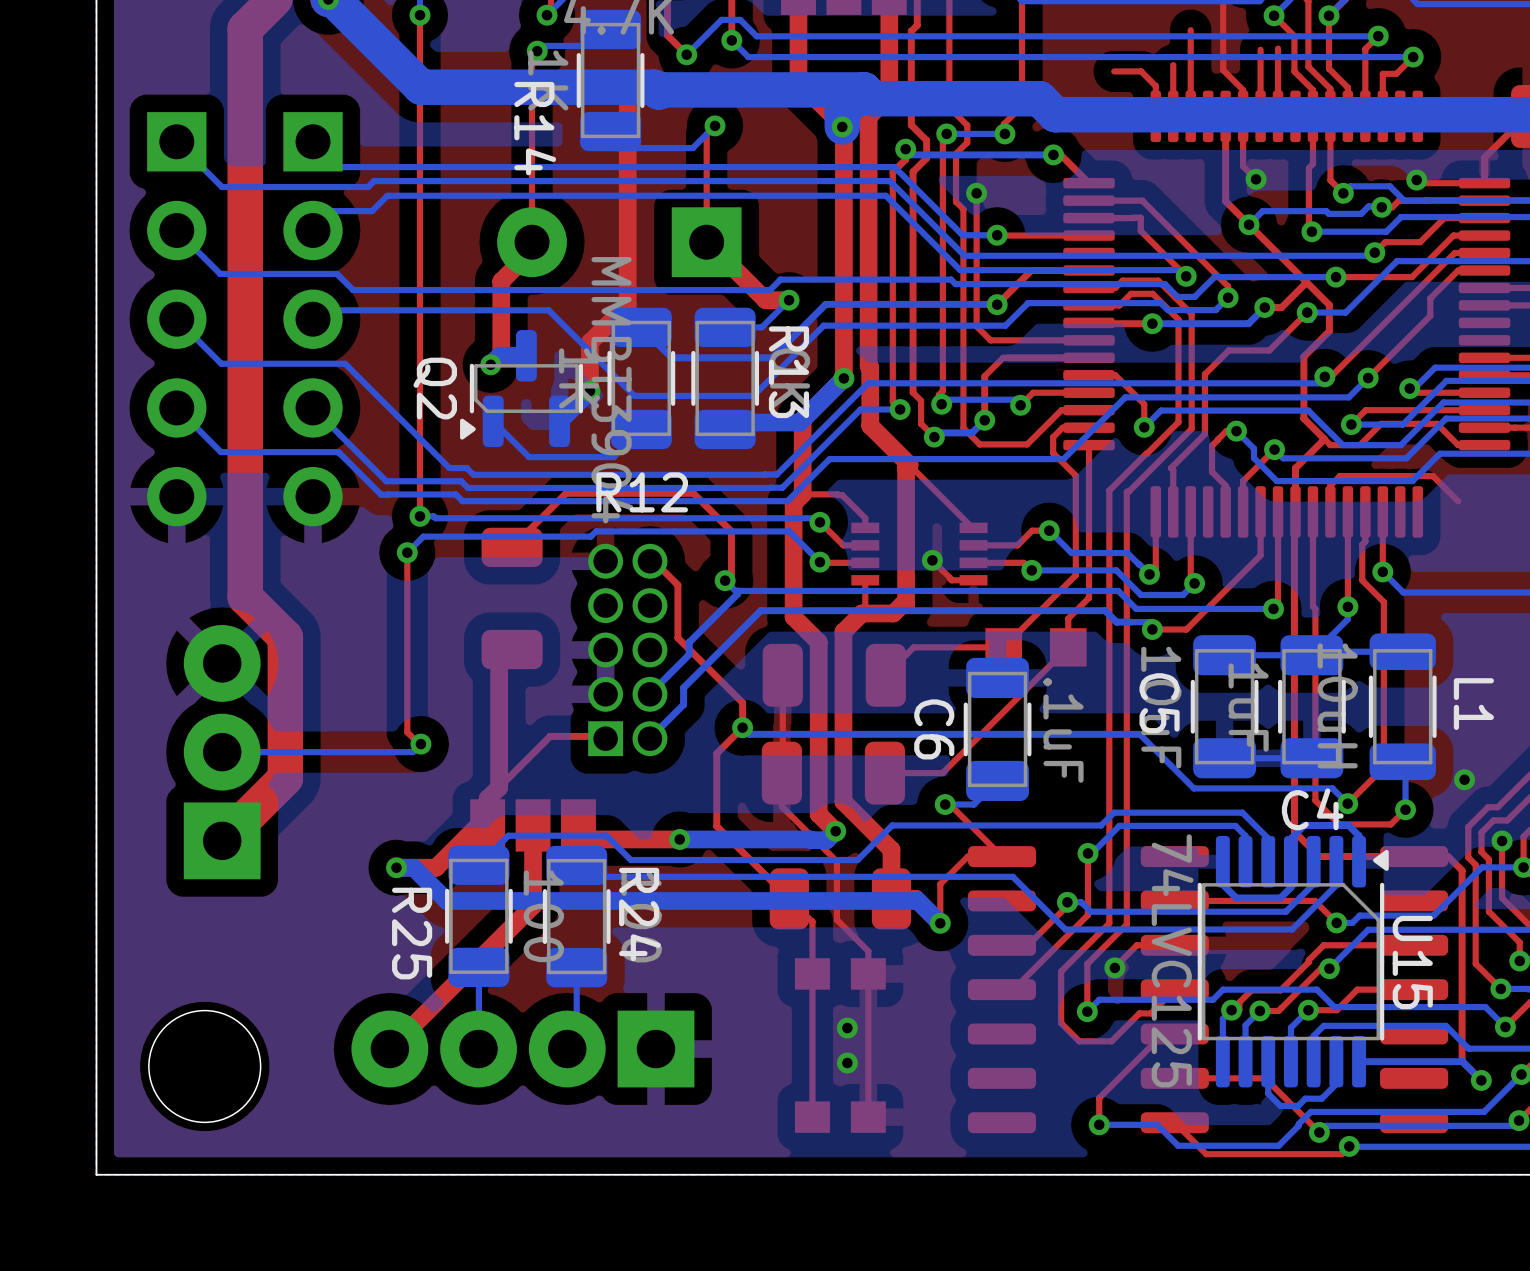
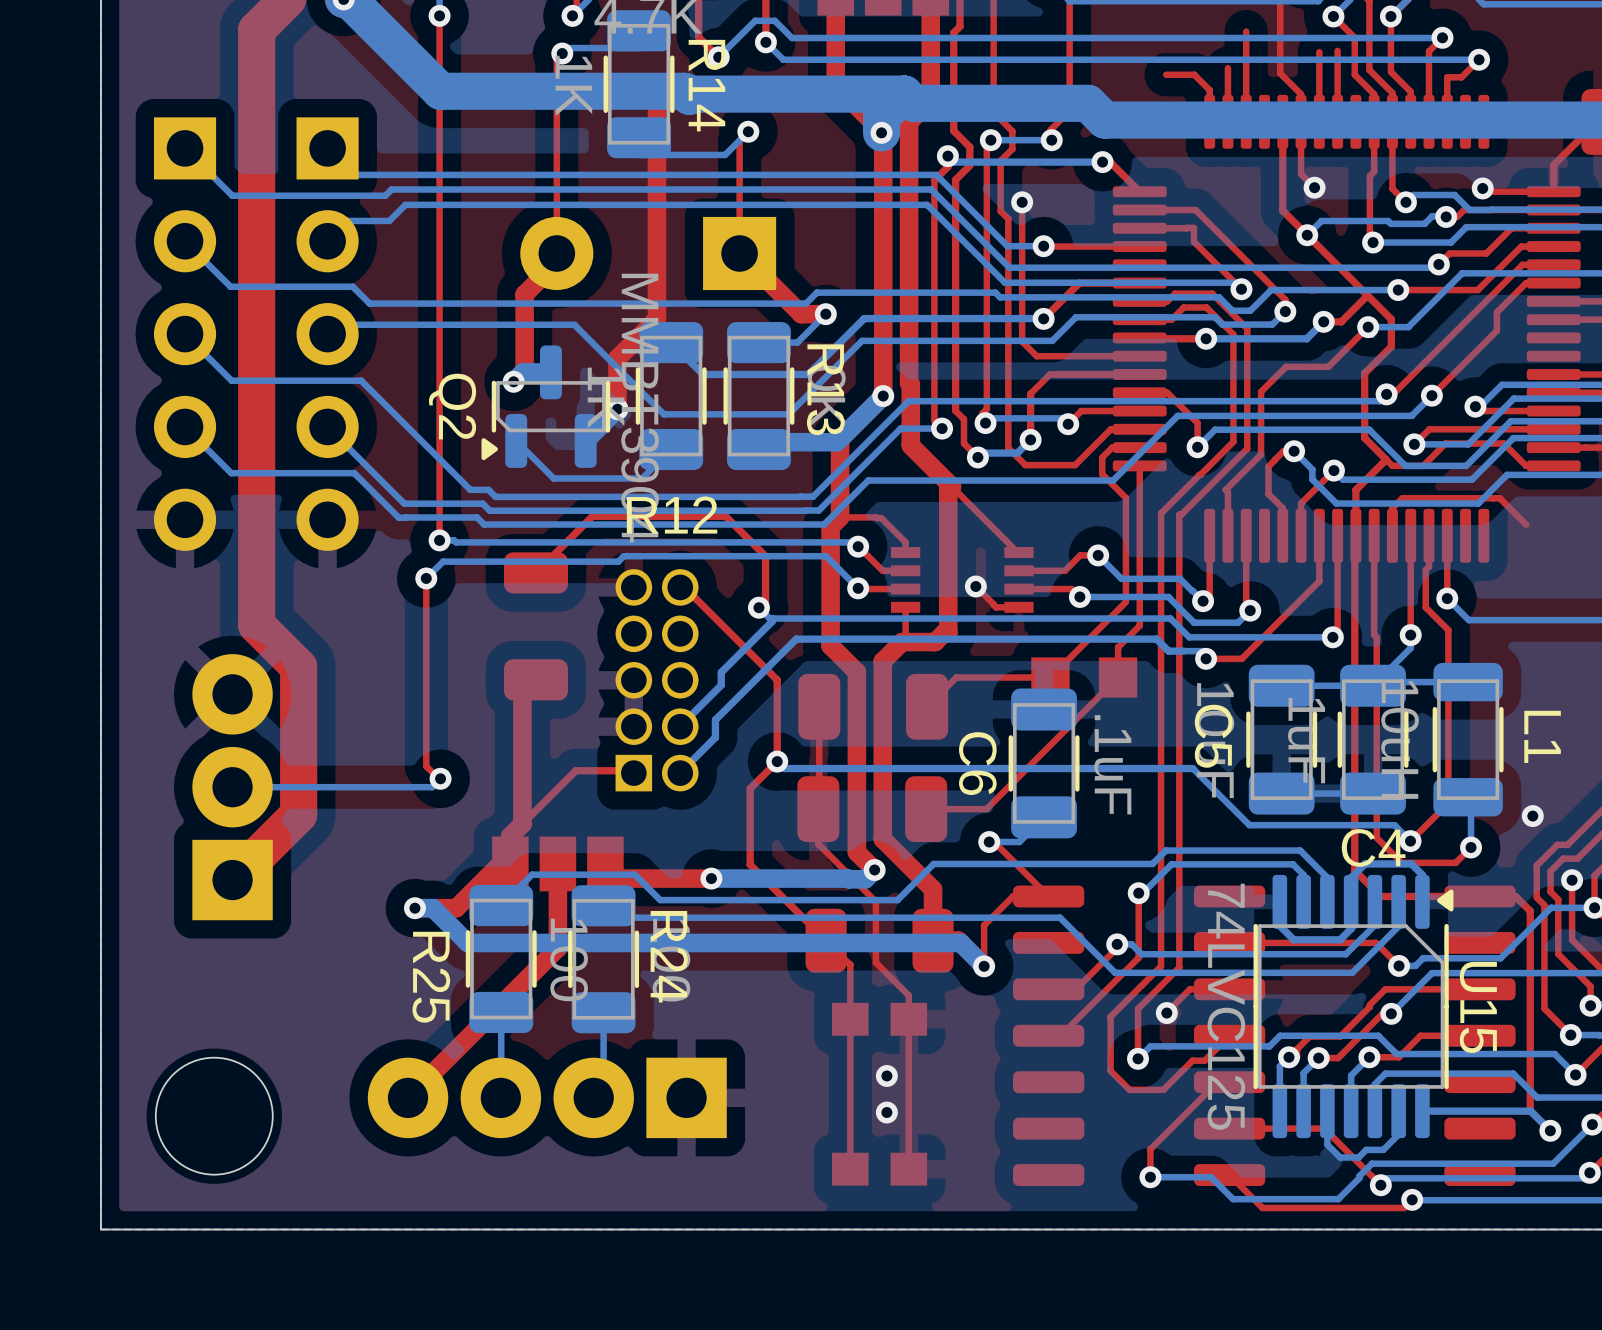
R14 name position: R14 (535, 128) -> R14 (706, 85)
top track: (677, 585) (677, 638) (742, 702) -> (709, 612) (777, 680) (777, 735)

